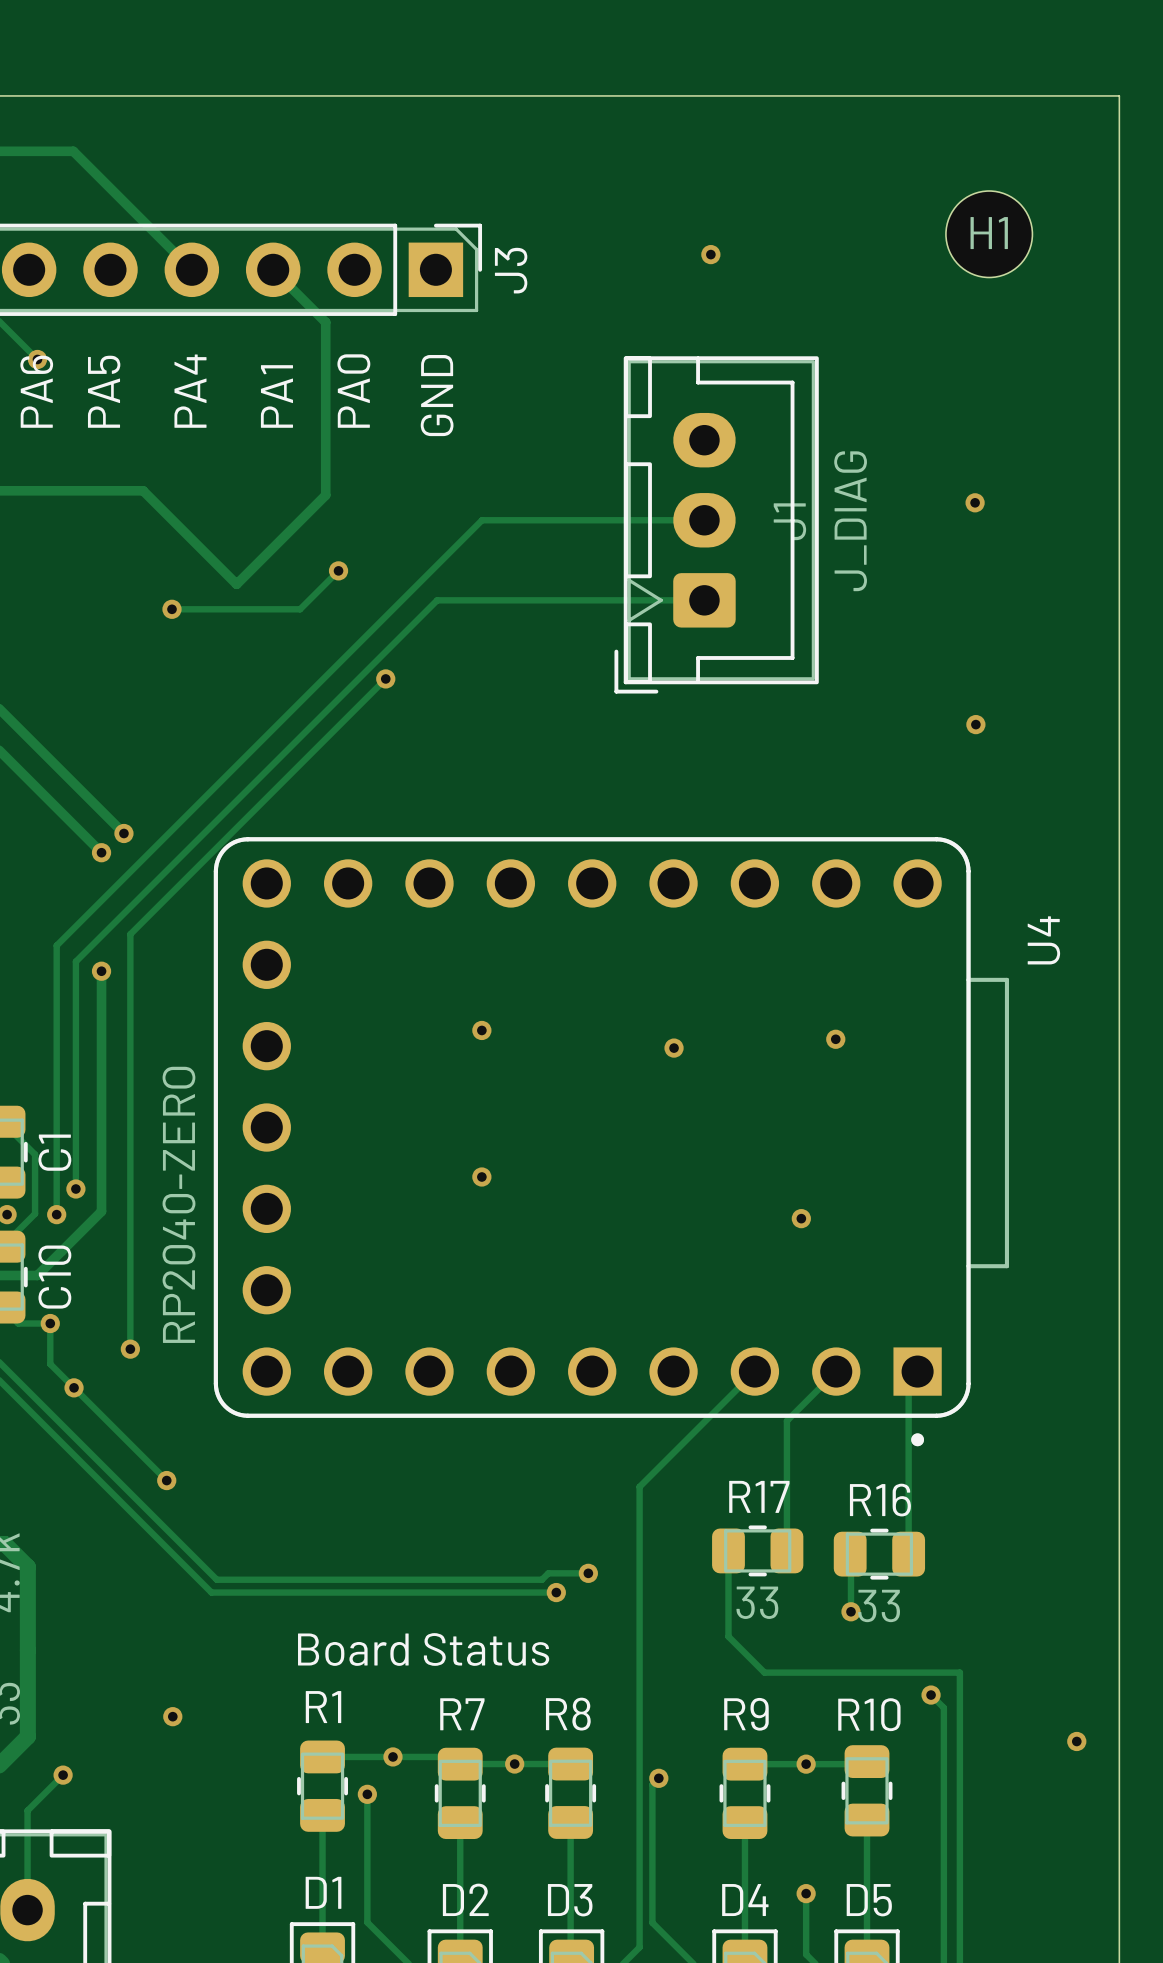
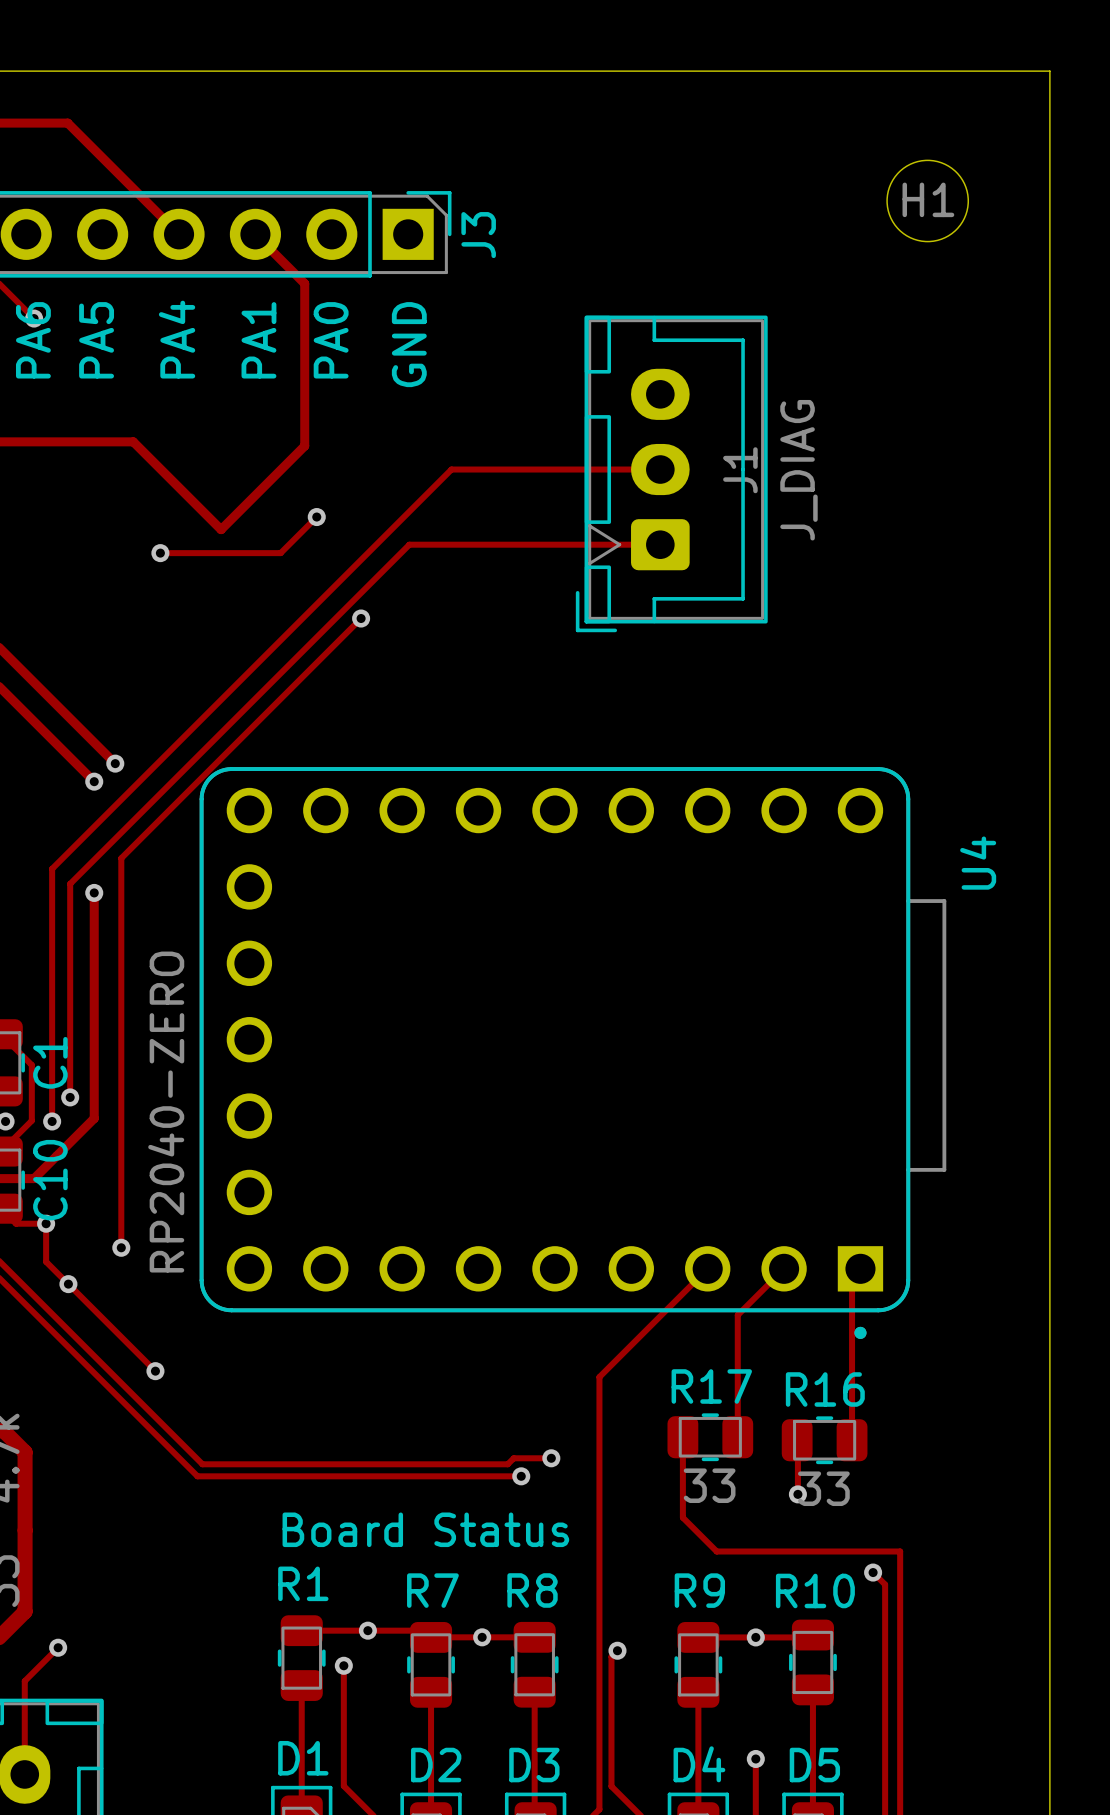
via: (710, 254) -> none
via: (975, 502) -> none
via: (975, 724) -> none
via: (481, 1030) -> none
via: (835, 1039) -> none
via: (674, 1048) -> none
via: (481, 1177) -> none
via: (801, 1218) -> none
via: (172, 1716) -> none
via: (1076, 1741) -> none

